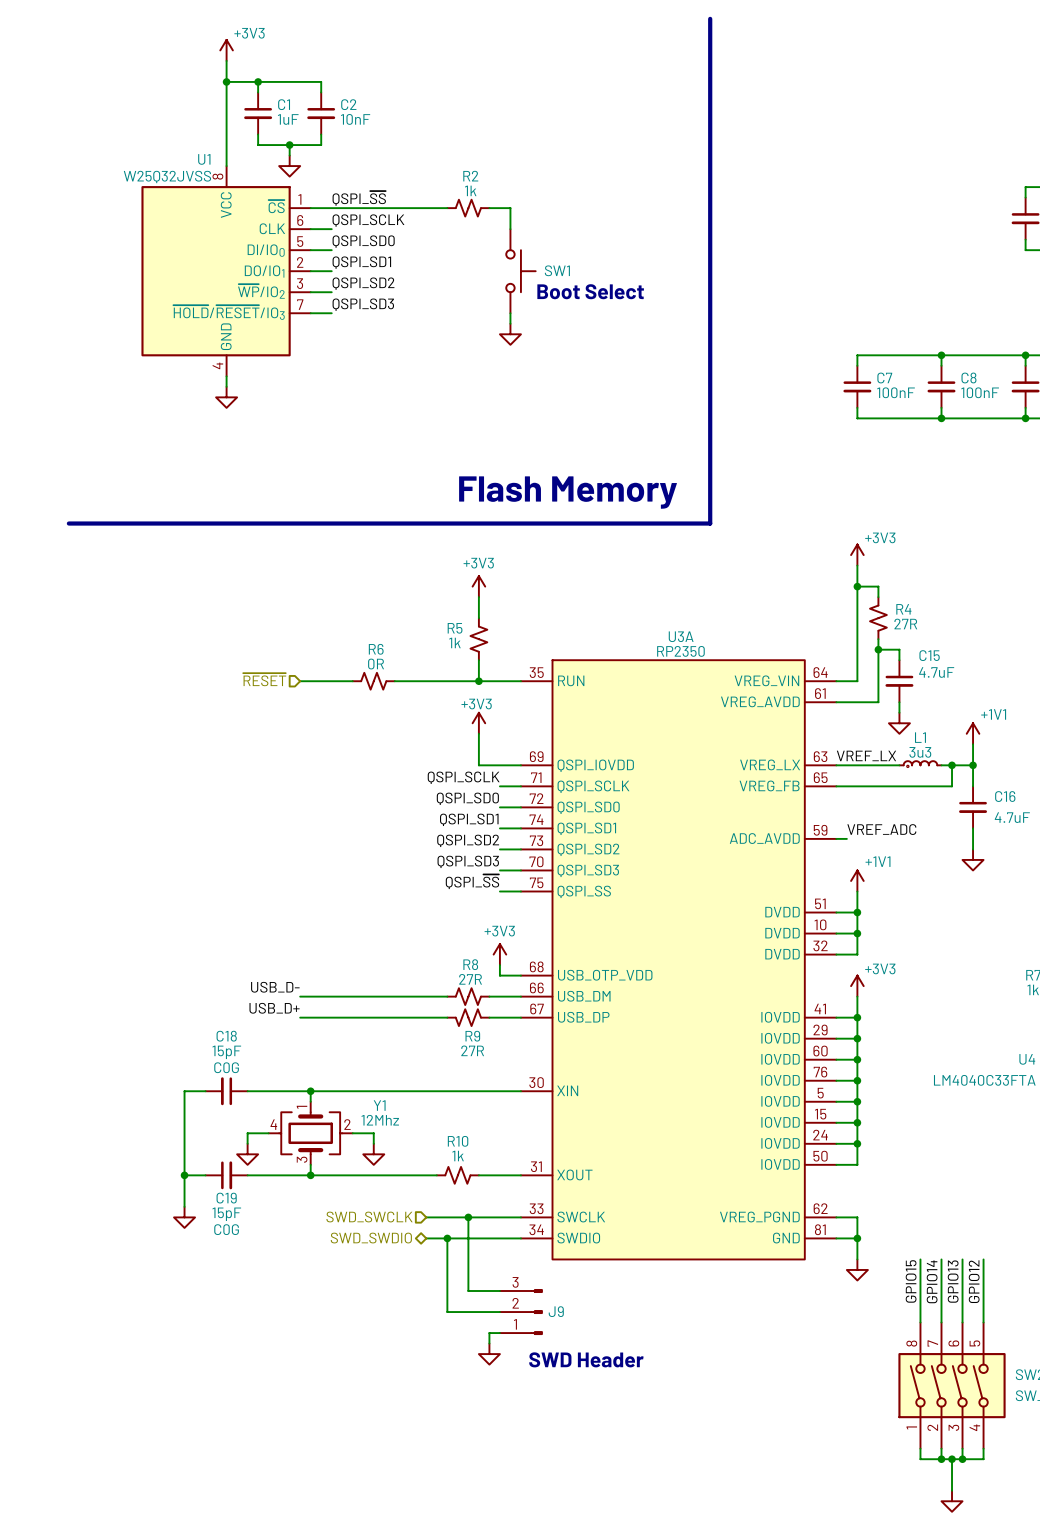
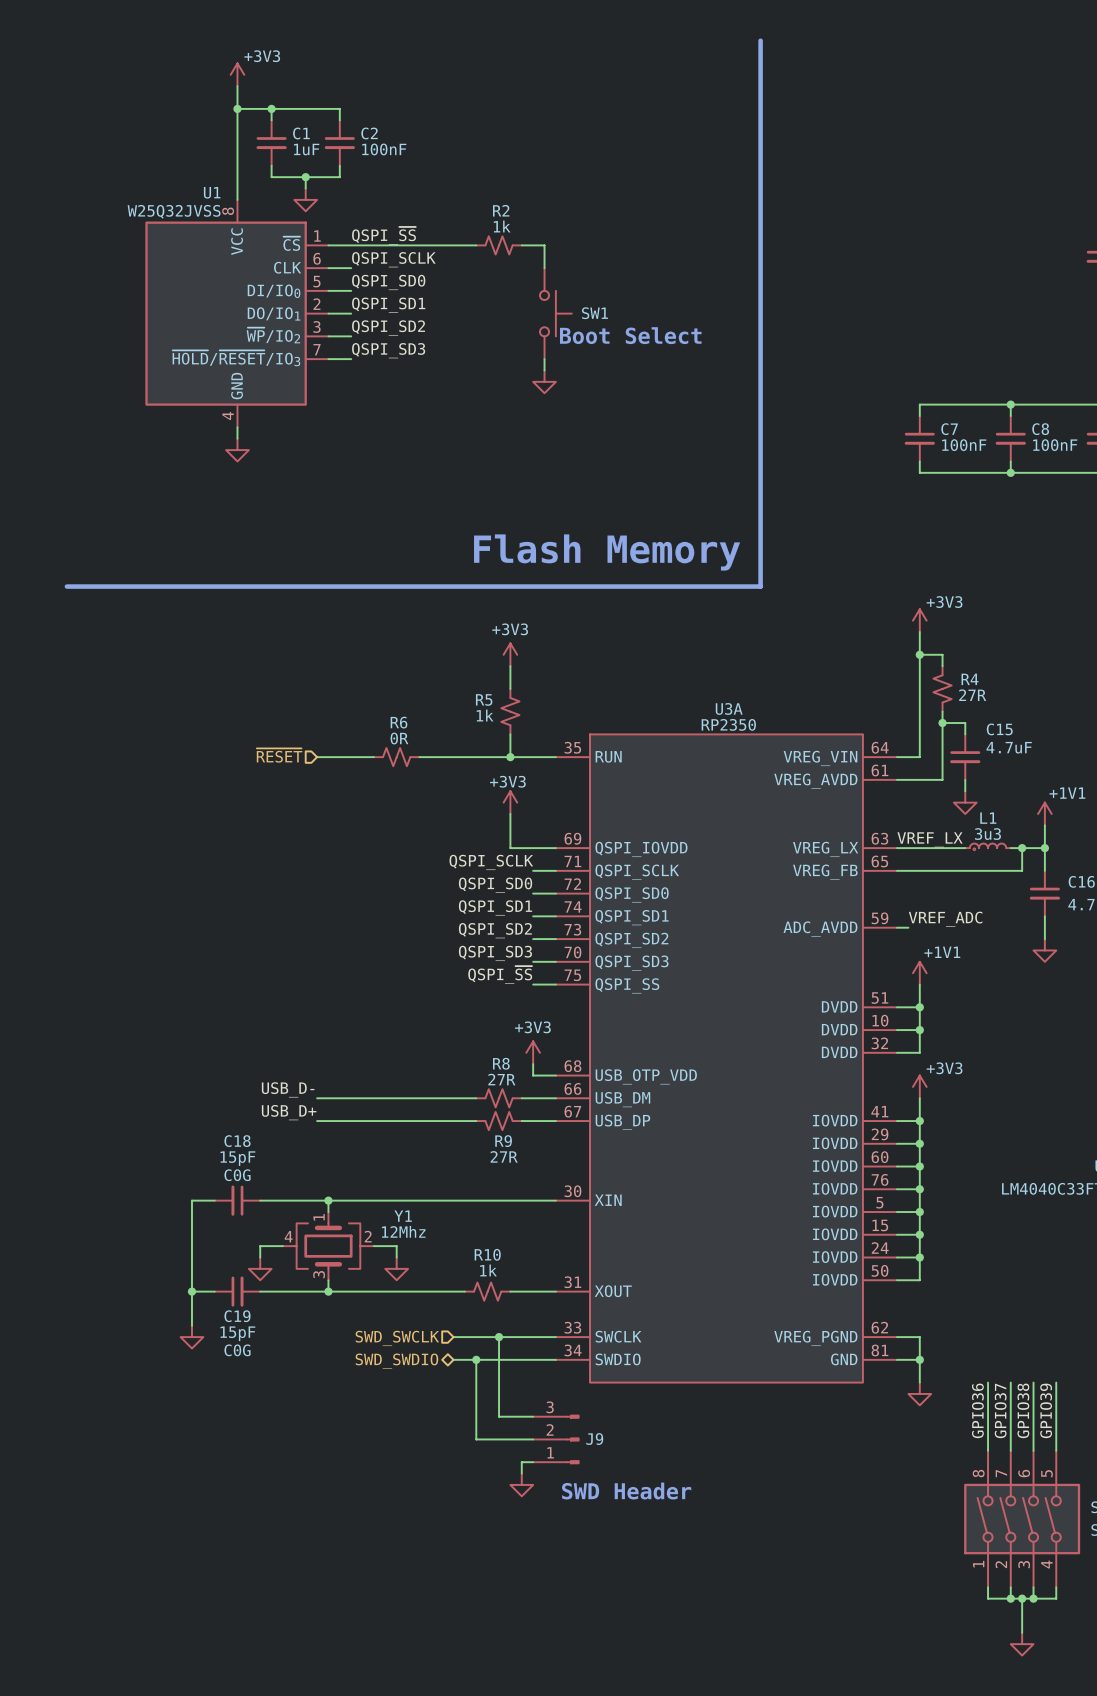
C2 value: 10nF (355, 119) -> 100nF (384, 149)
label: GPIO15 (911, 1281) -> GPIO36 (977, 1410)
label: GPIO14 (932, 1281) -> GPIO37 (1000, 1410)
label: GPIO13 (953, 1281) -> GPIO38 (1023, 1410)
label: GPIO12 (974, 1281) -> GPIO39 (1046, 1410)

